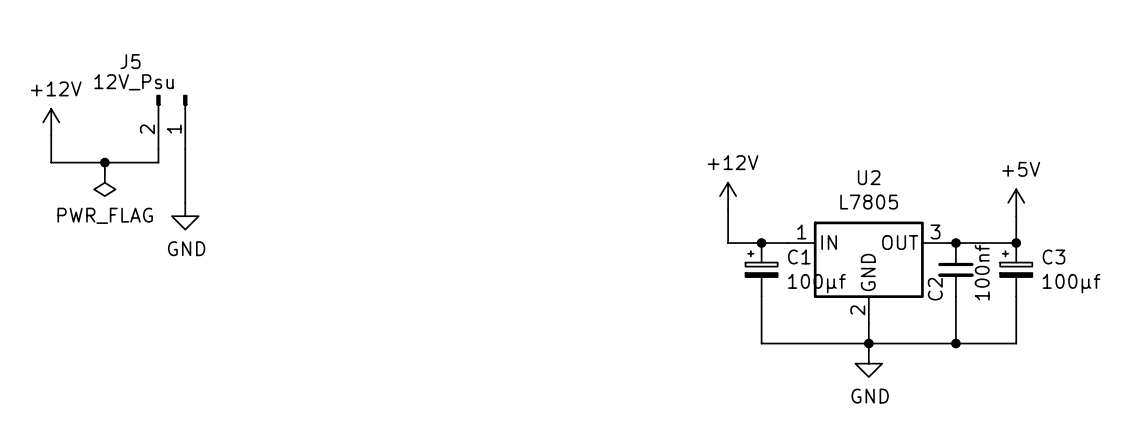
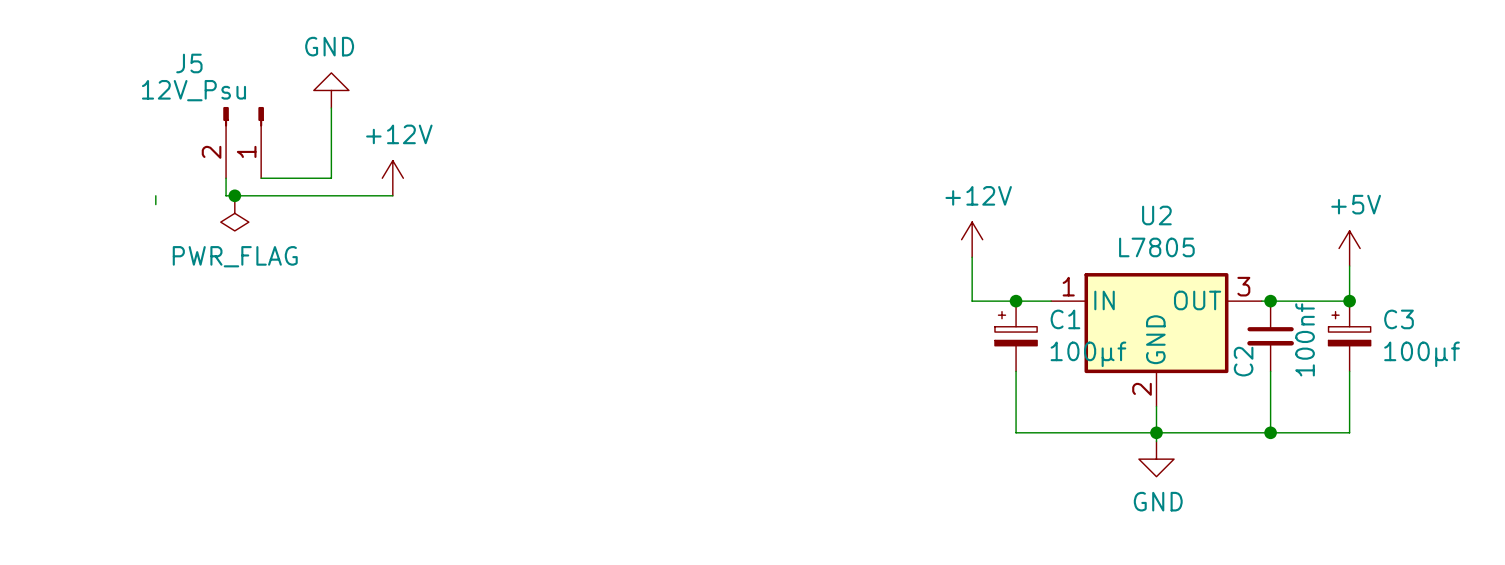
power symbol position: +12V (51, 122) -> +12V (392, 178)
wire: (51, 135) (51, 162) (158, 162) -> (392, 195) (226, 195)
wire: (185, 149) (185, 202) -> (261, 178) (331, 178) (331, 108)
junction position: (104, 162) -> (234, 195)
power symbol position: PWR_FLAG (104, 182) -> PWR_FLAG (234, 213)
power symbol rotation: 0° (185, 216) -> 180° (331, 90)
power symbol position: GND (185, 216) -> GND (331, 90)

